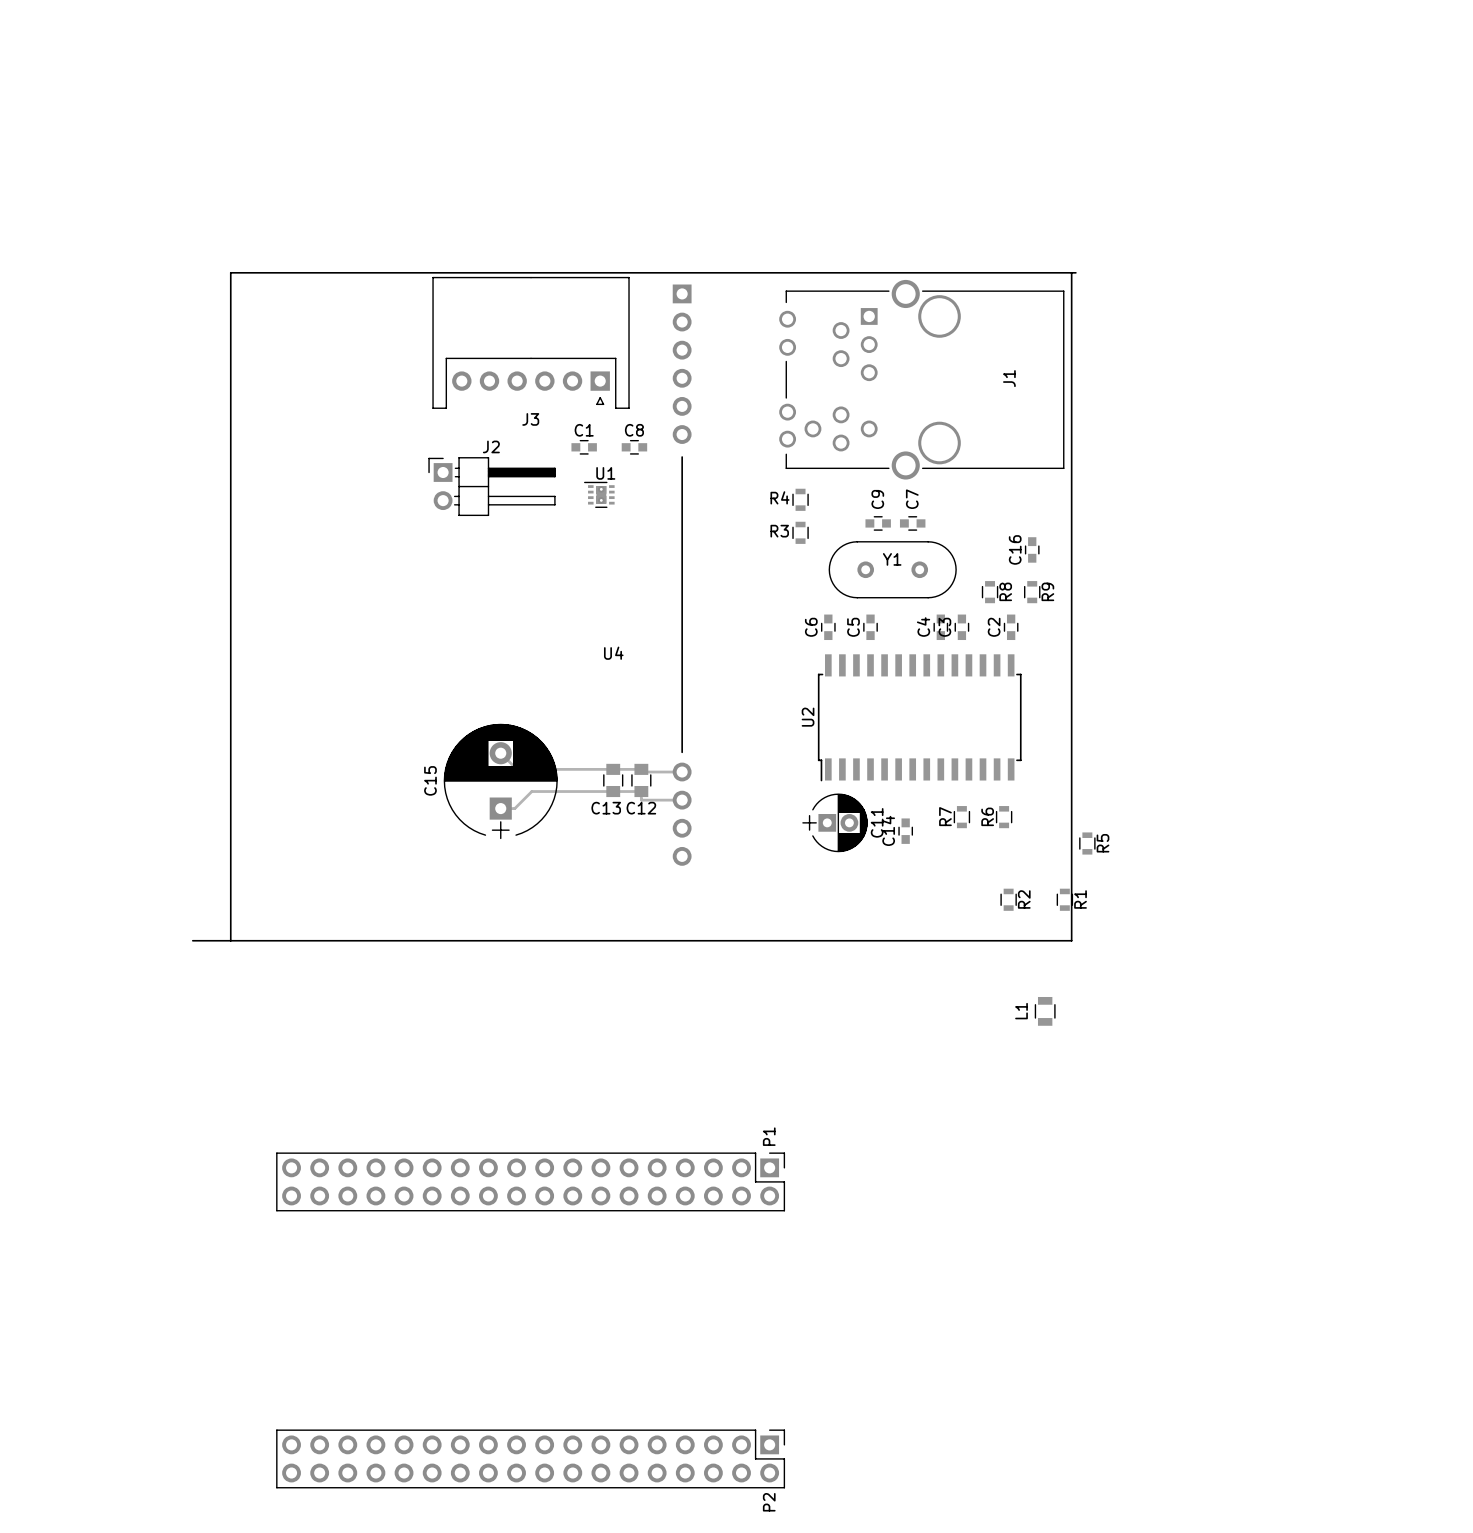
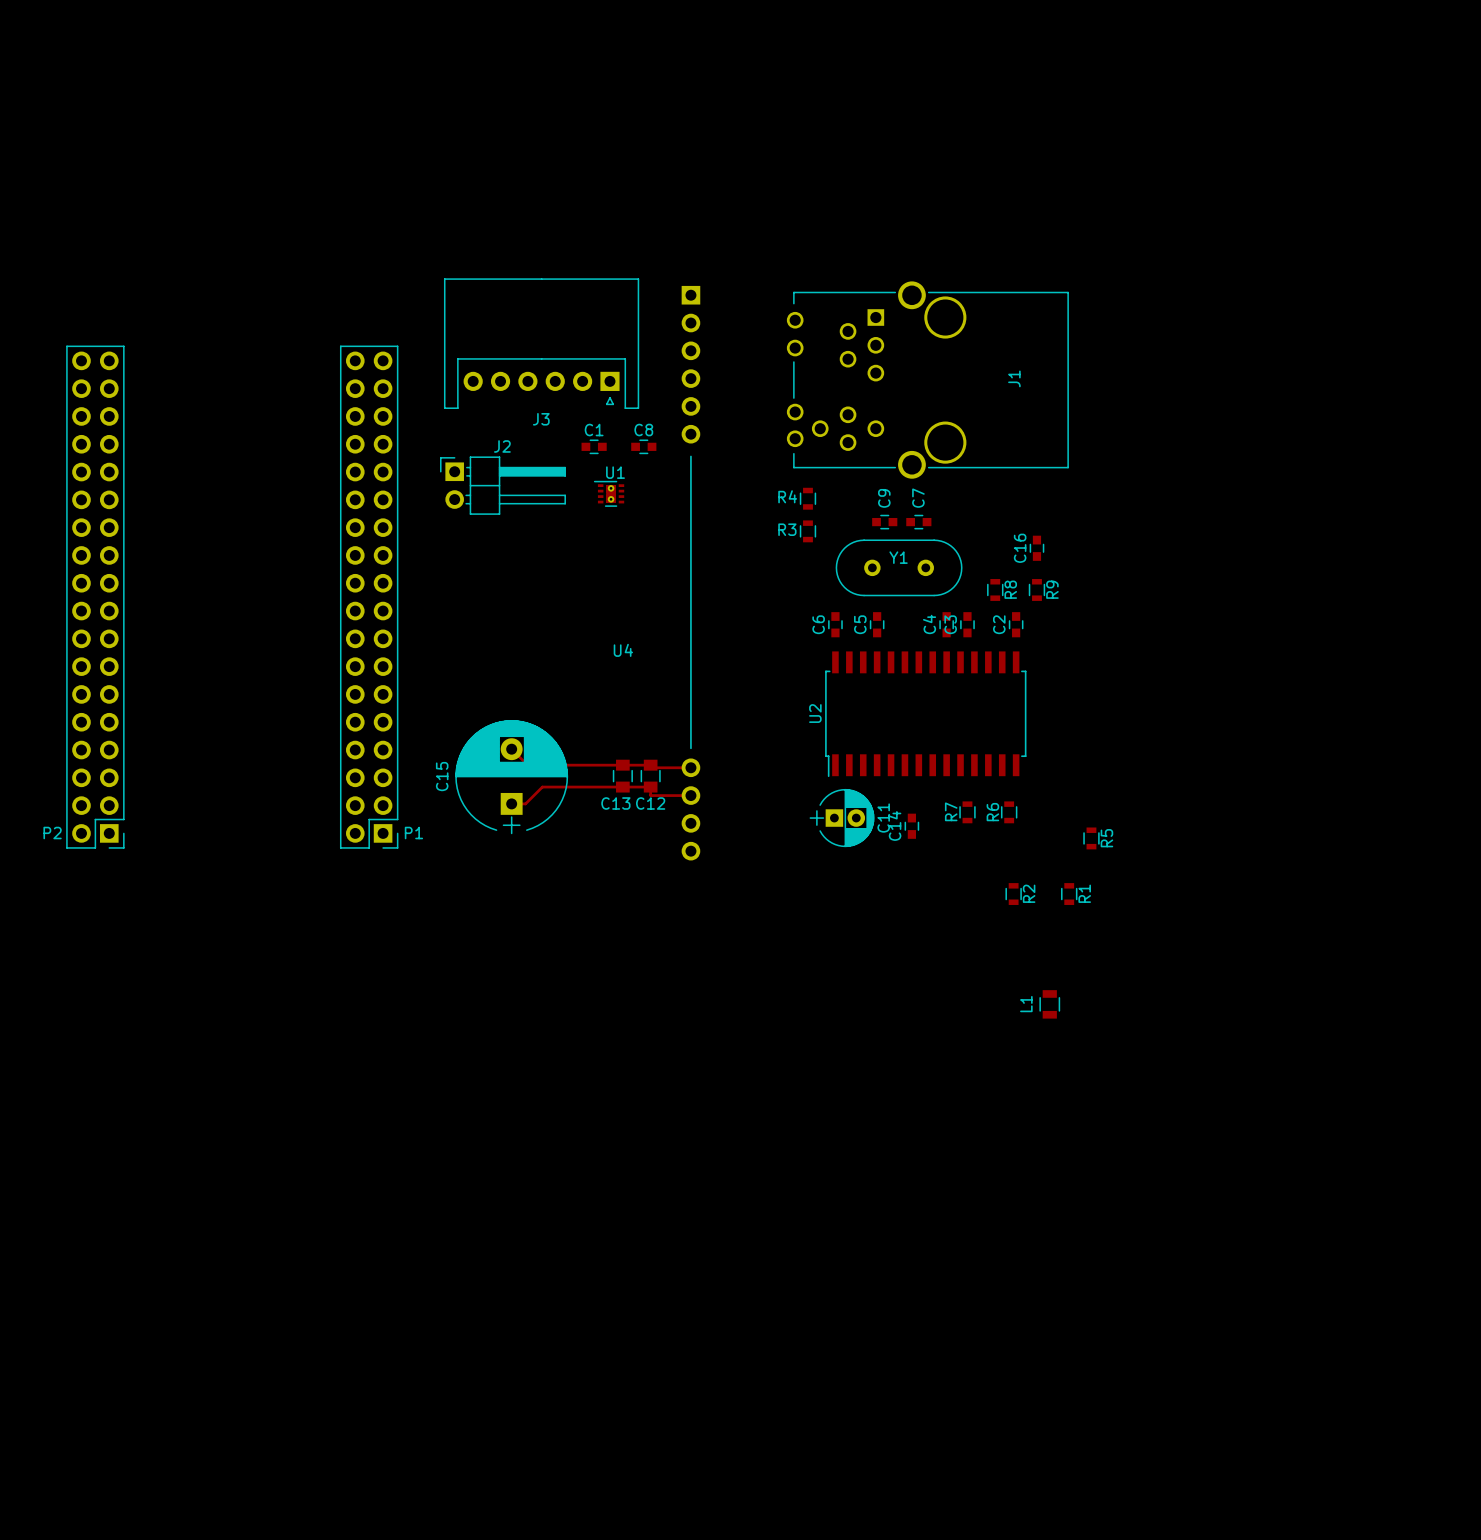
board edge: (1071, 272) (1071, 940) (192, 940) -> none
board edge: (1075, 272) (230, 272) (230, 940) -> none
P1 rotation: 0° (530, 1181) -> 90° clockwise (369, 597)
P1 position: (530, 1181) -> (369, 597)
P2 rotation: 0° (530, 1458) -> 90° clockwise (95, 597)
P2 position: (530, 1458) -> (95, 597)

